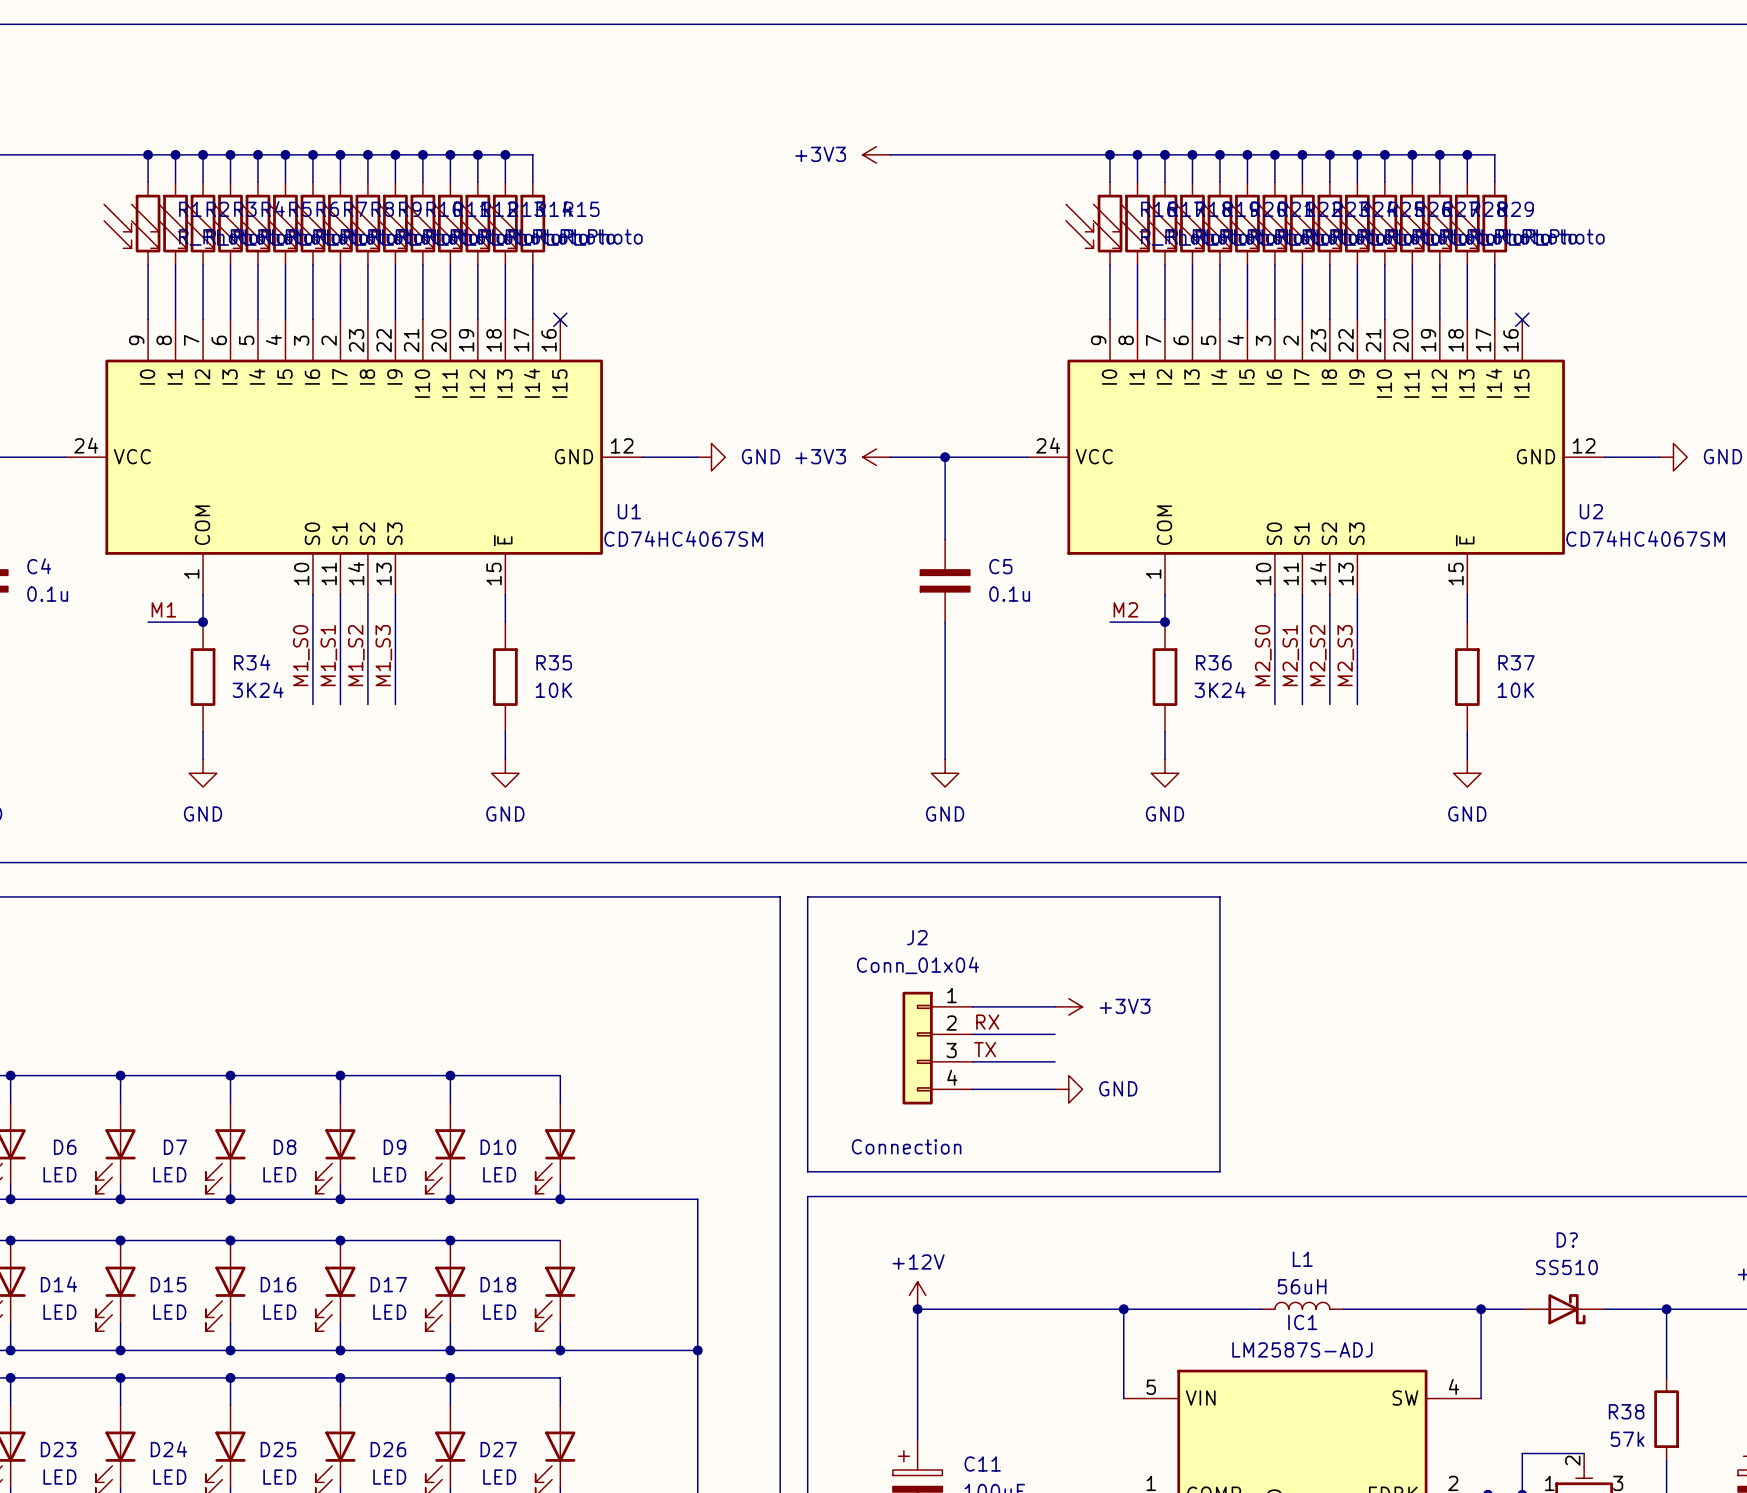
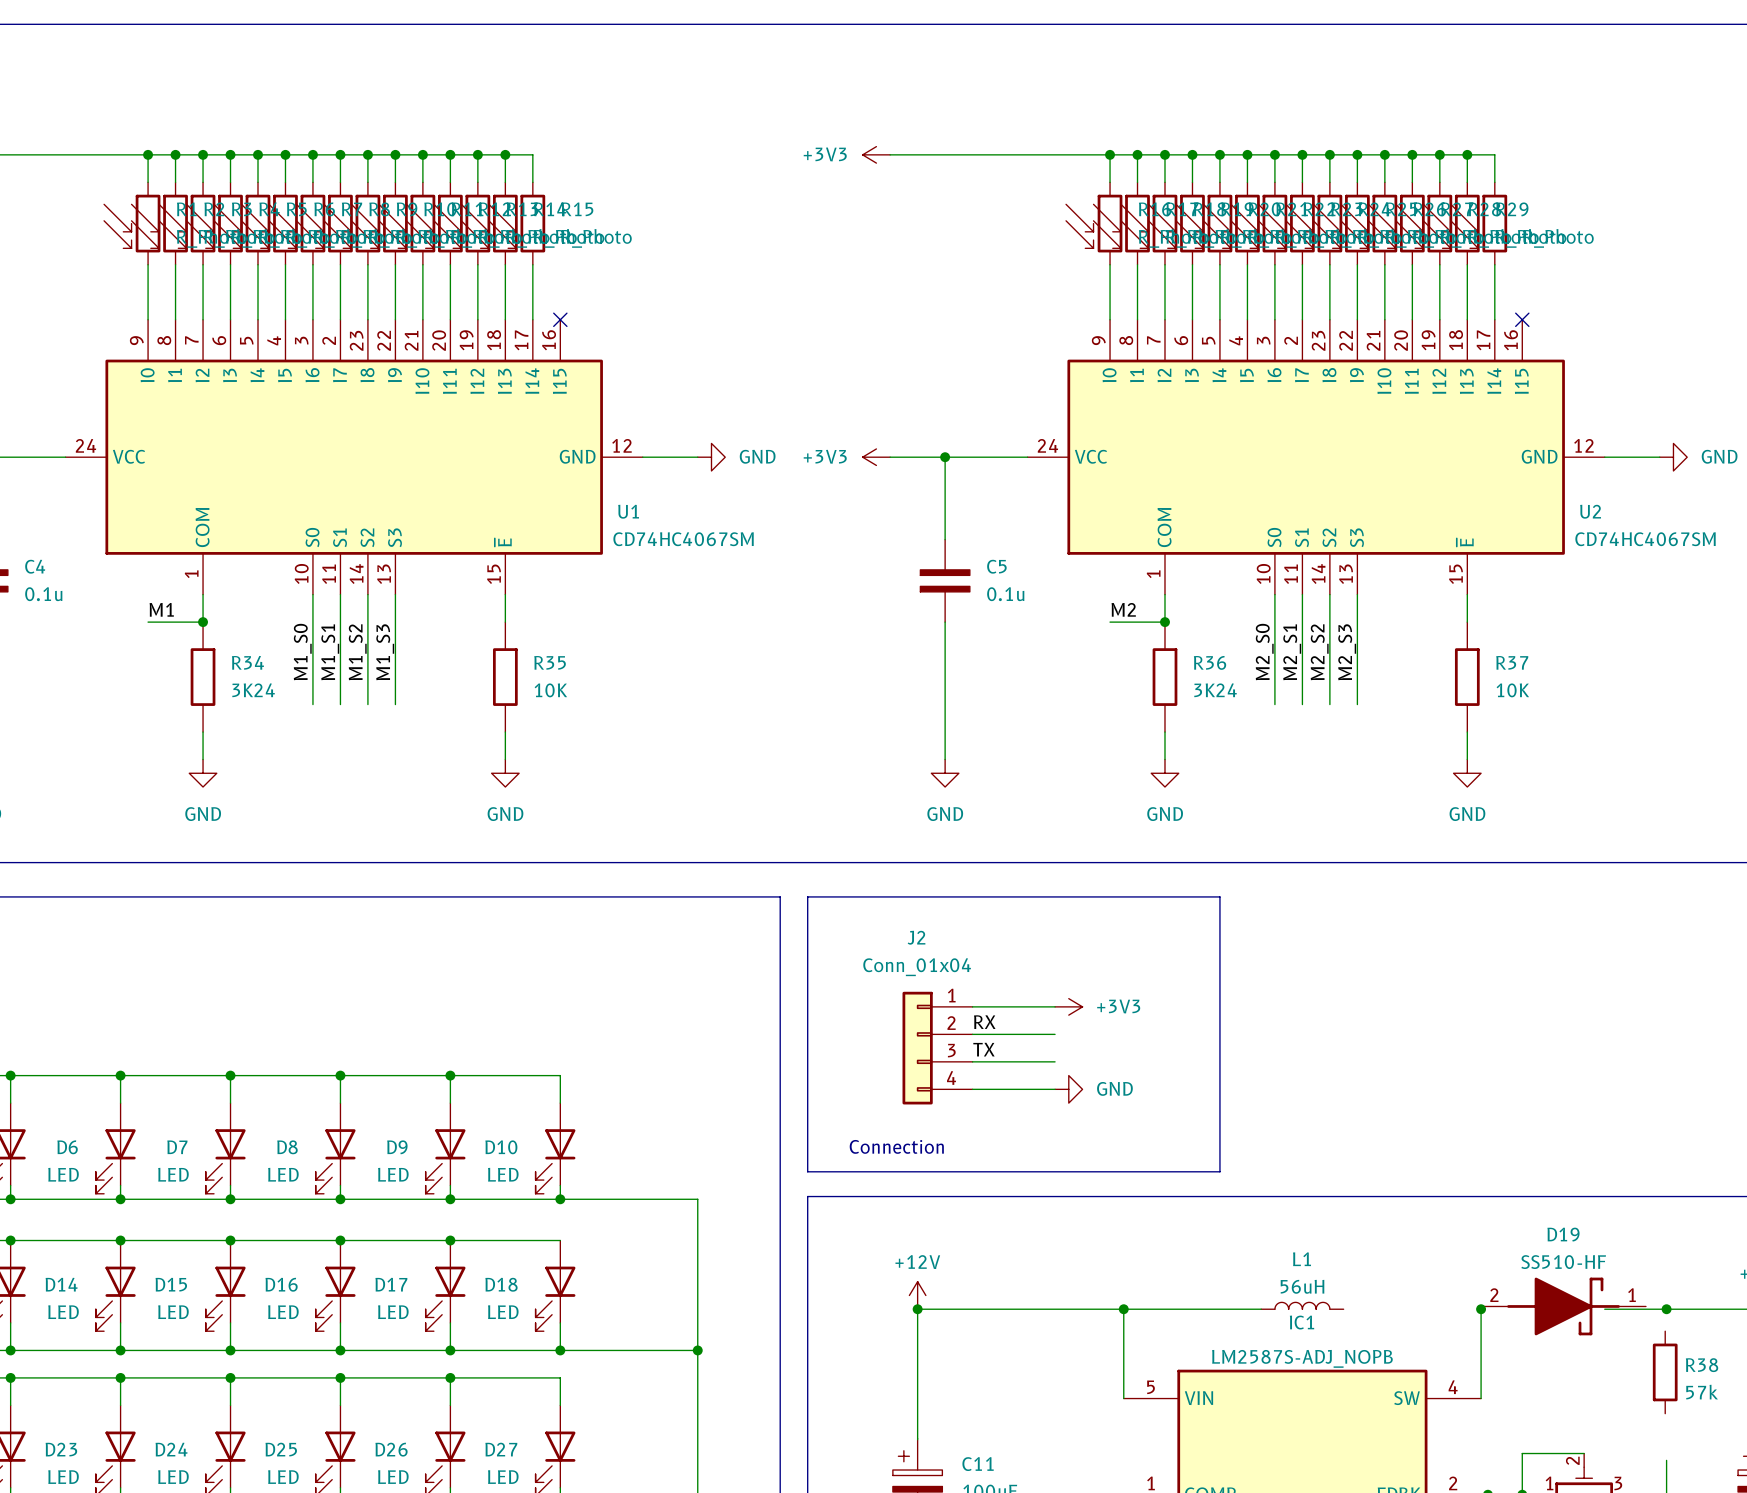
D19: none -> SS510-HF (1563, 1306)
wire: (1343, 1309) (1522, 1309) -> none
D?: SS510 (1563, 1309) -> none
wire: (1666, 1309) (1666, 1377) -> none
IC1 value: LM2587S-ADJ (1302, 1349) -> LM2587S-ADJ_NOPB (1302, 1358)
R38 name position: R38 (1626, 1411) -> R38 (1702, 1365)
R38 position: (1666, 1419) -> (1665, 1372)
R38 value position: 57k (1627, 1439) -> 57k (1702, 1392)

